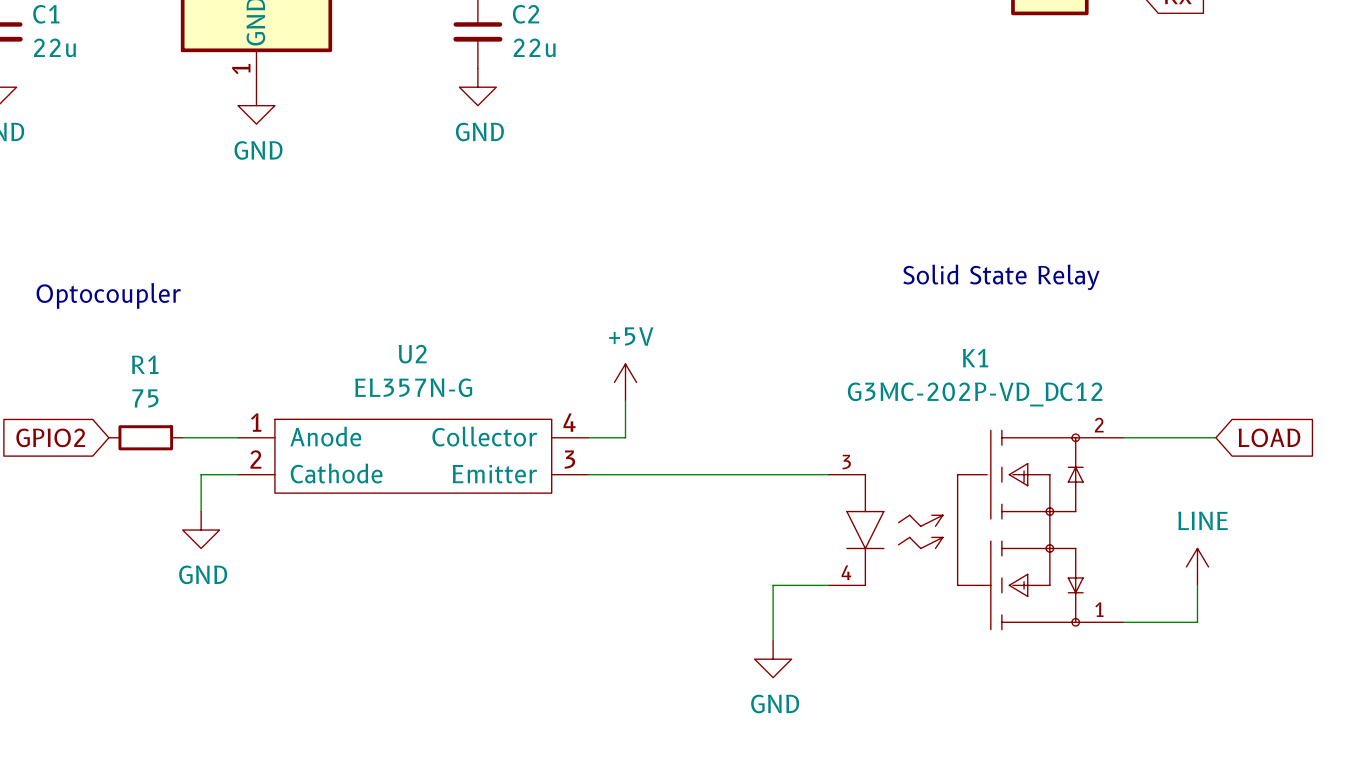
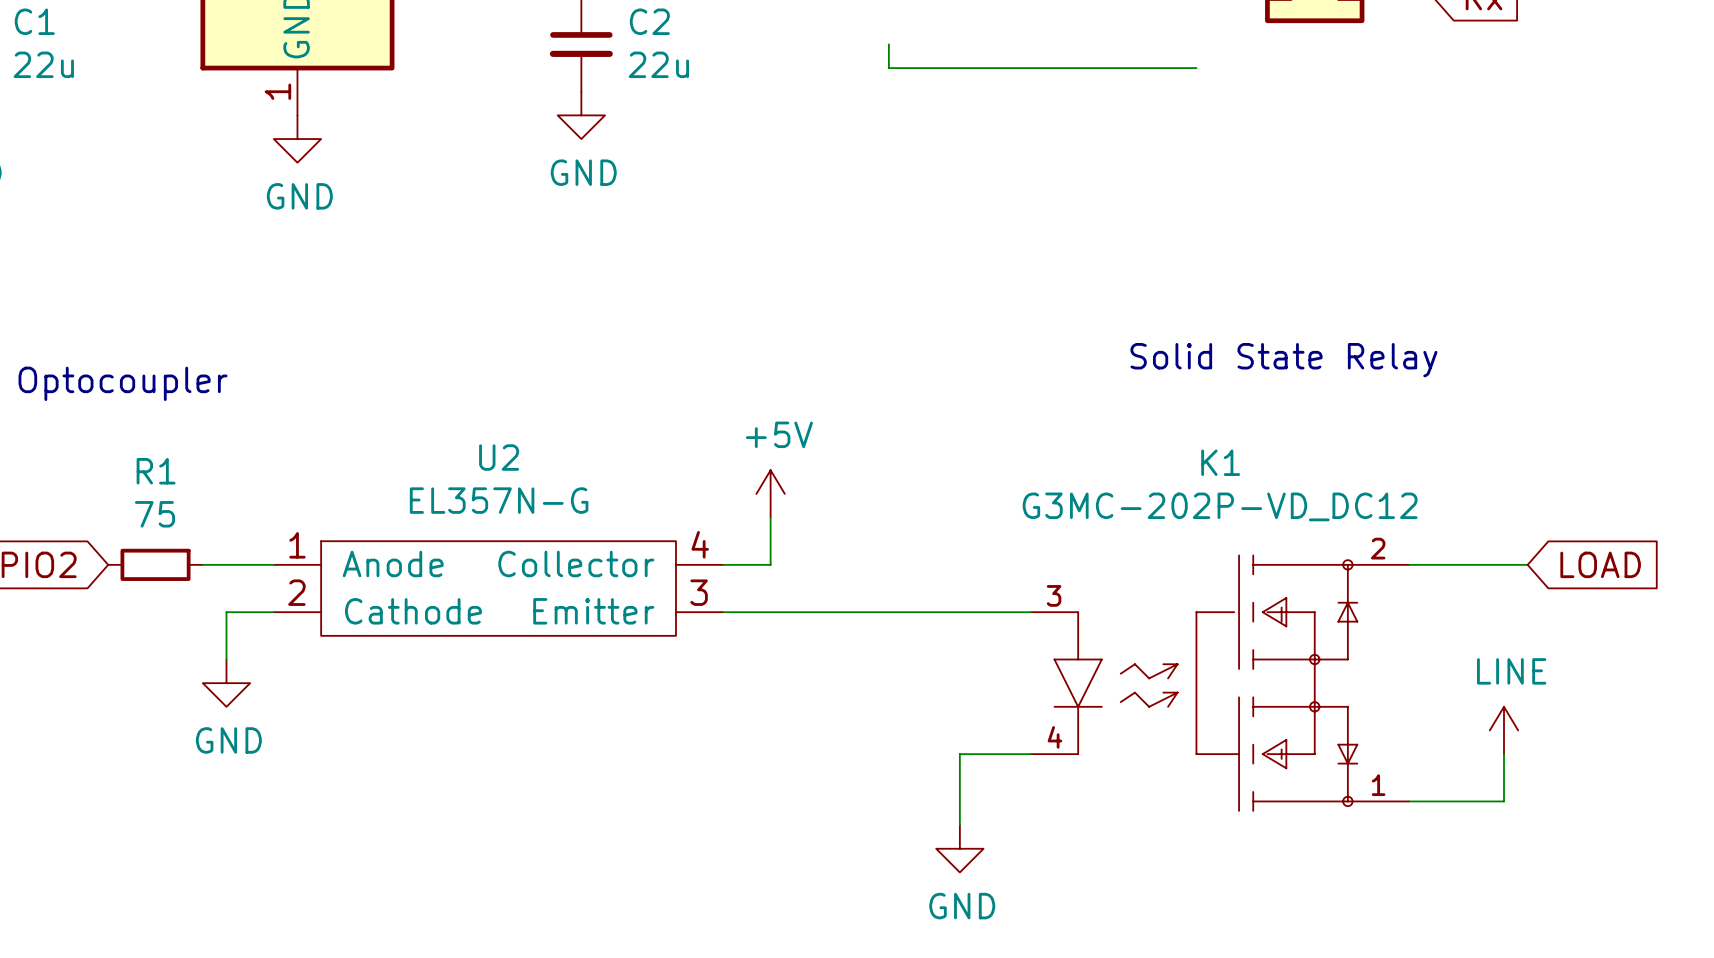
wire: none -> (888, 44) (888, 68) (1196, 68)

